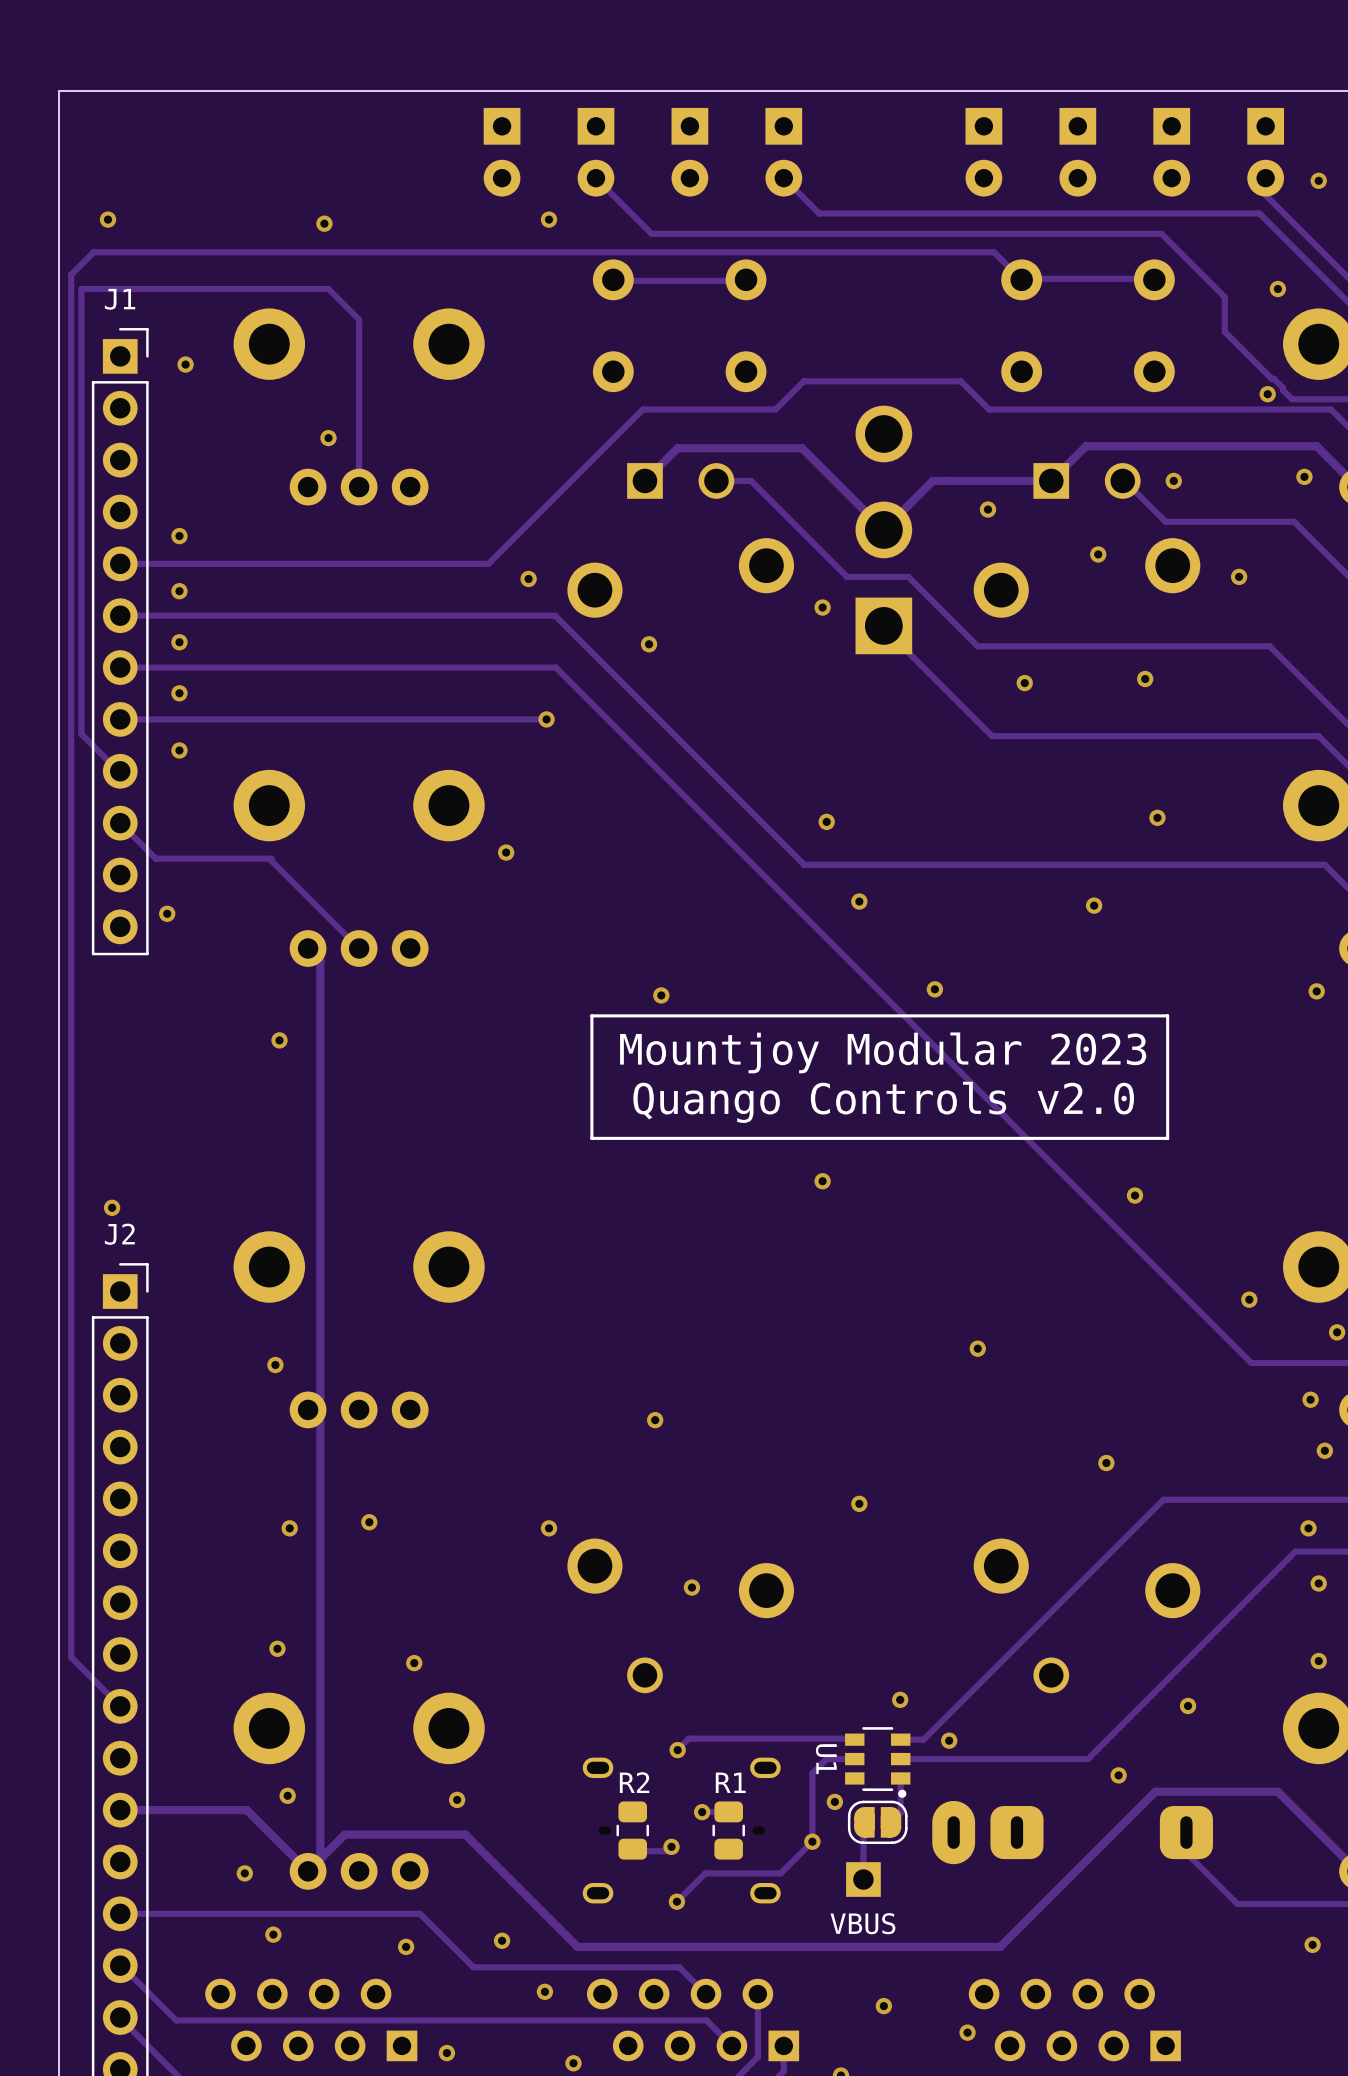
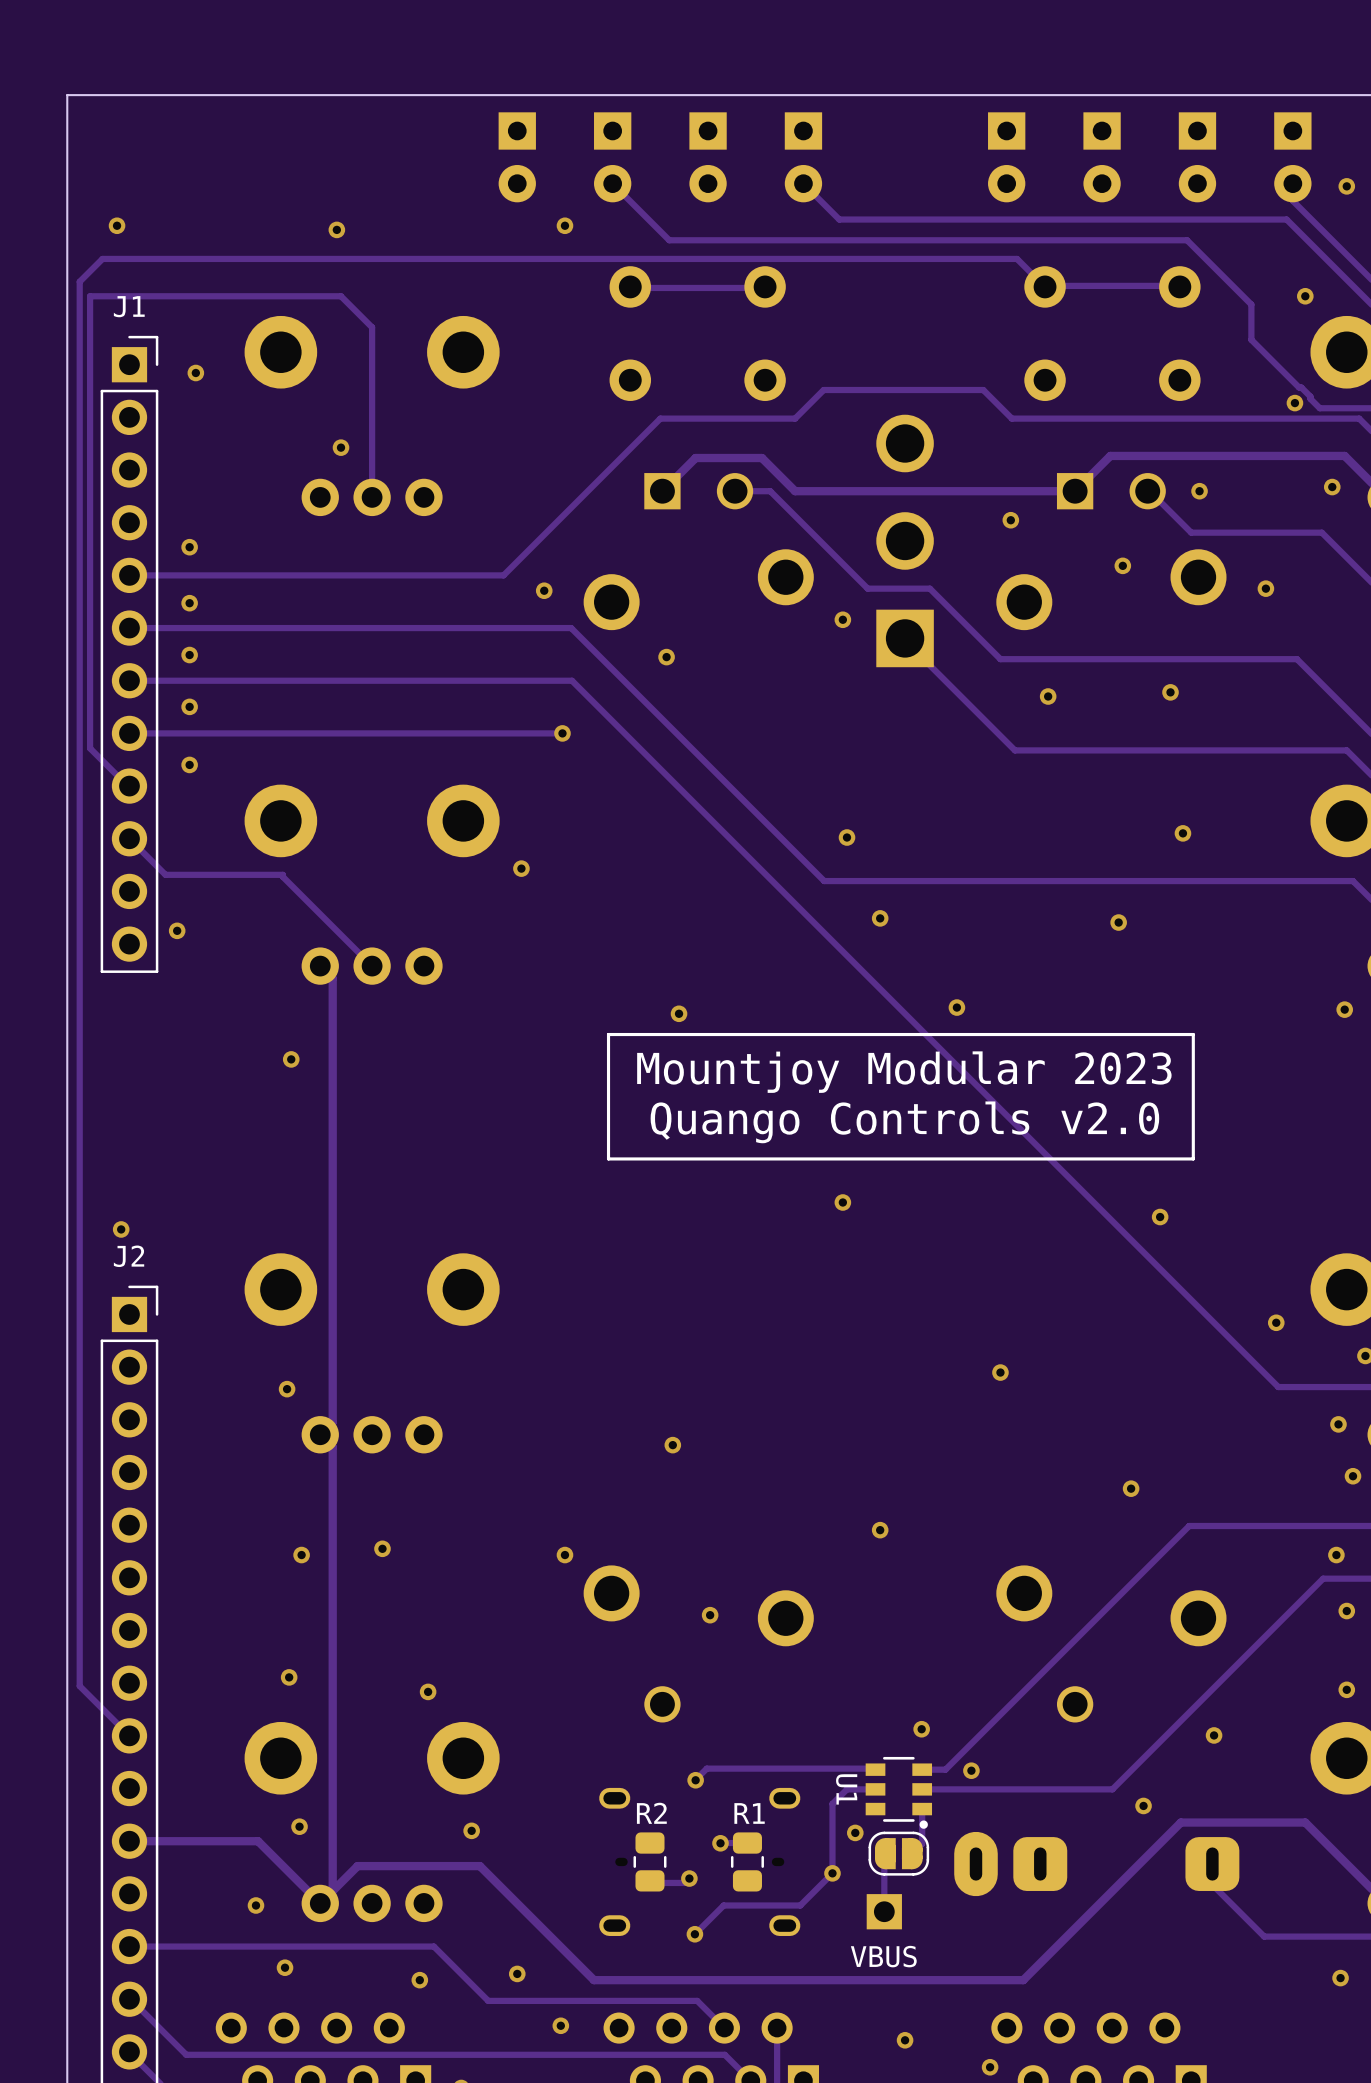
track: (742, 448) (802, 448) (883, 529) (932, 480) -> (761, 458) (795, 491) (954, 491)

